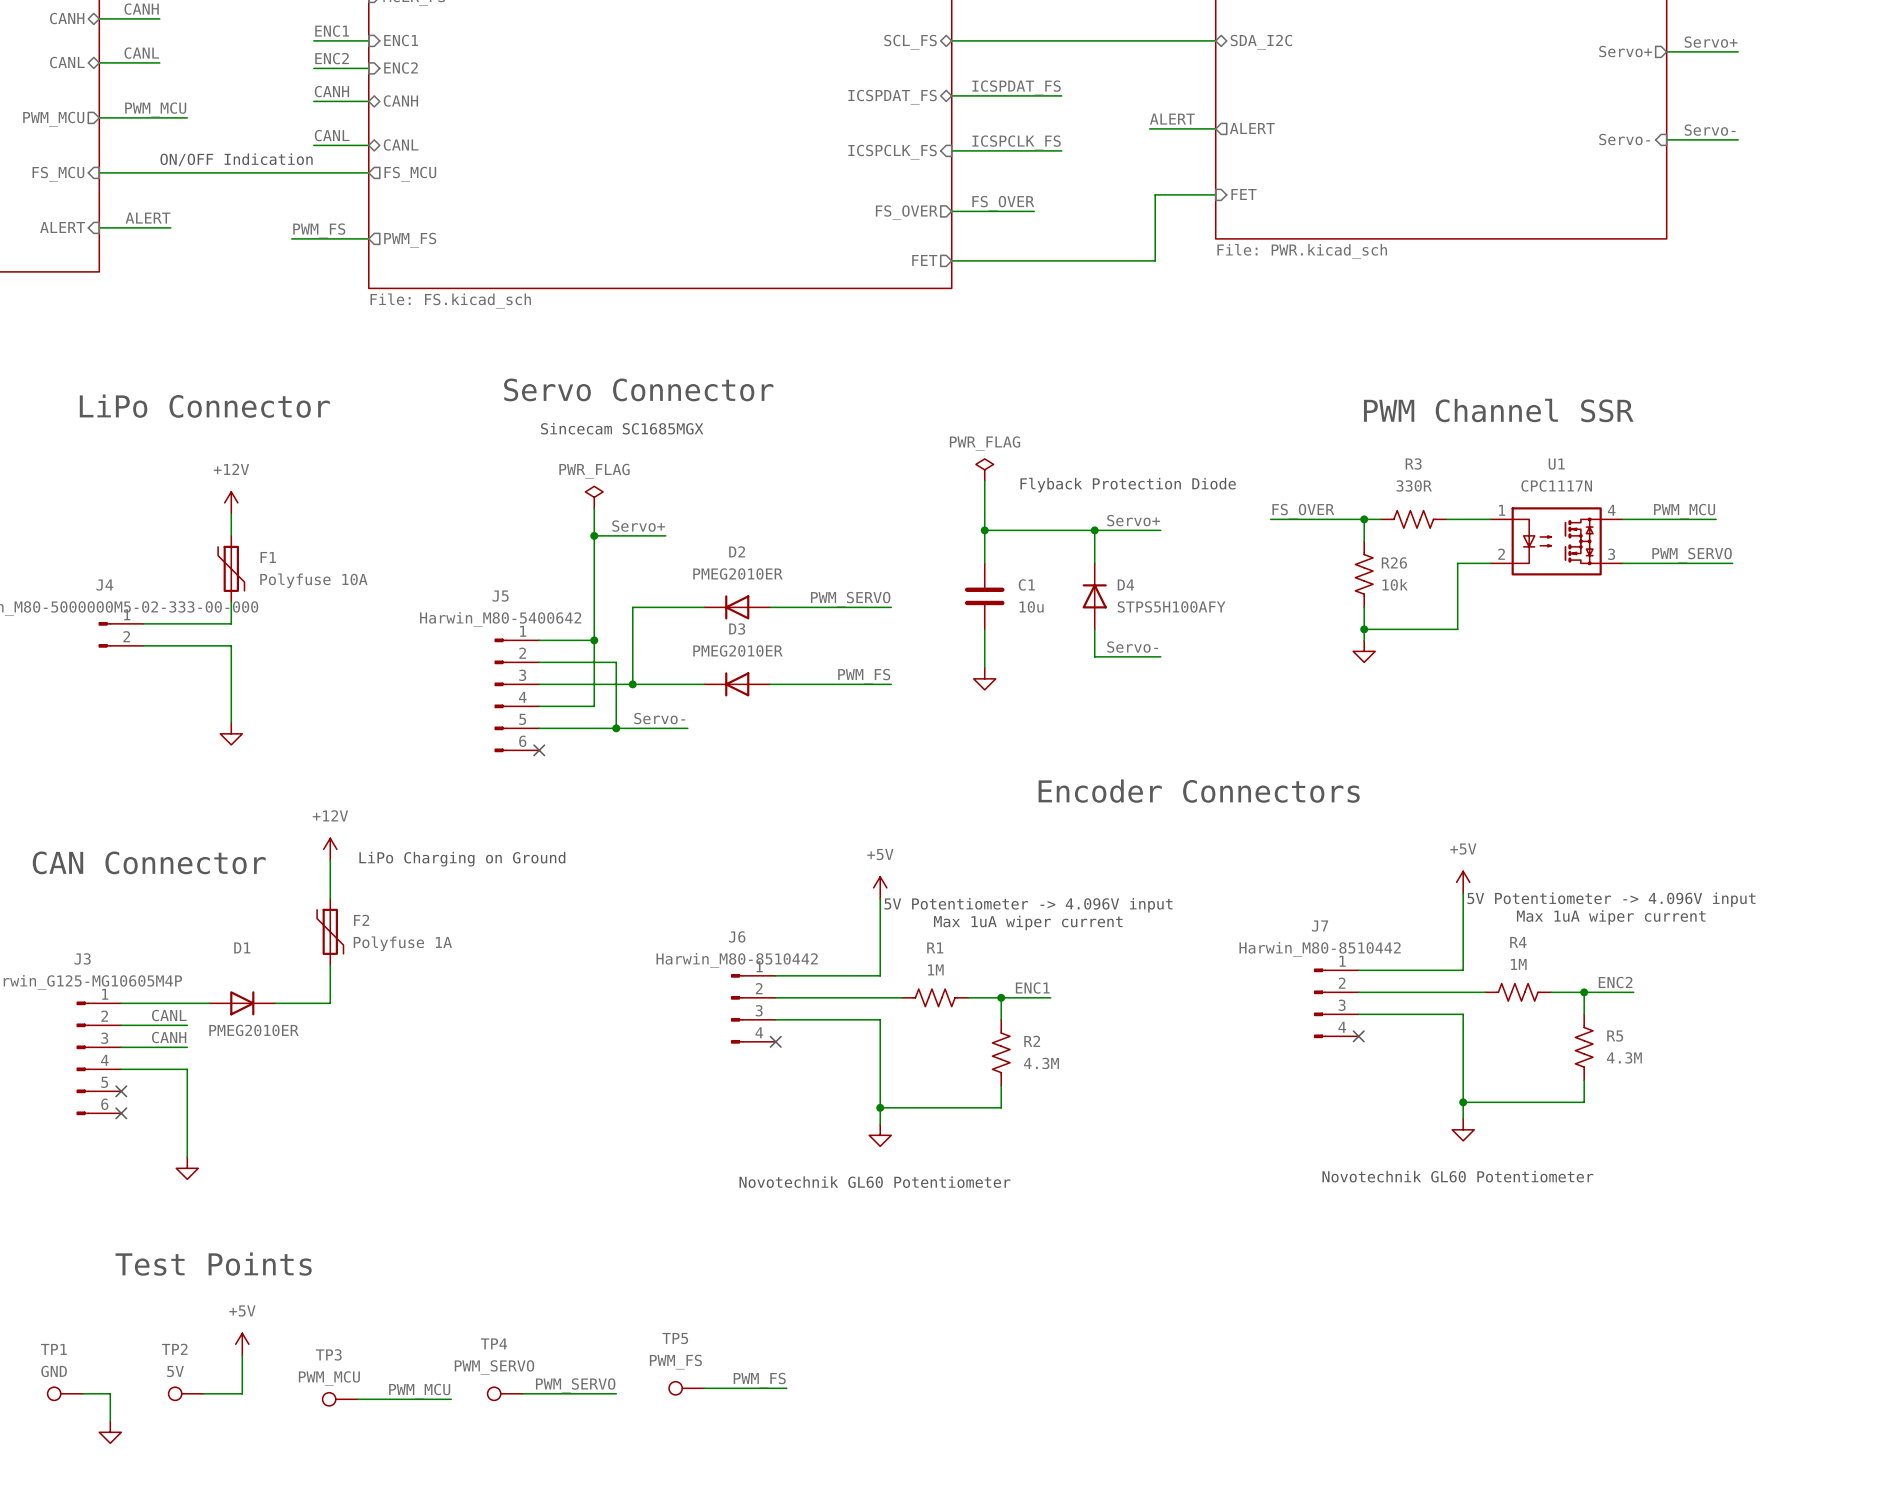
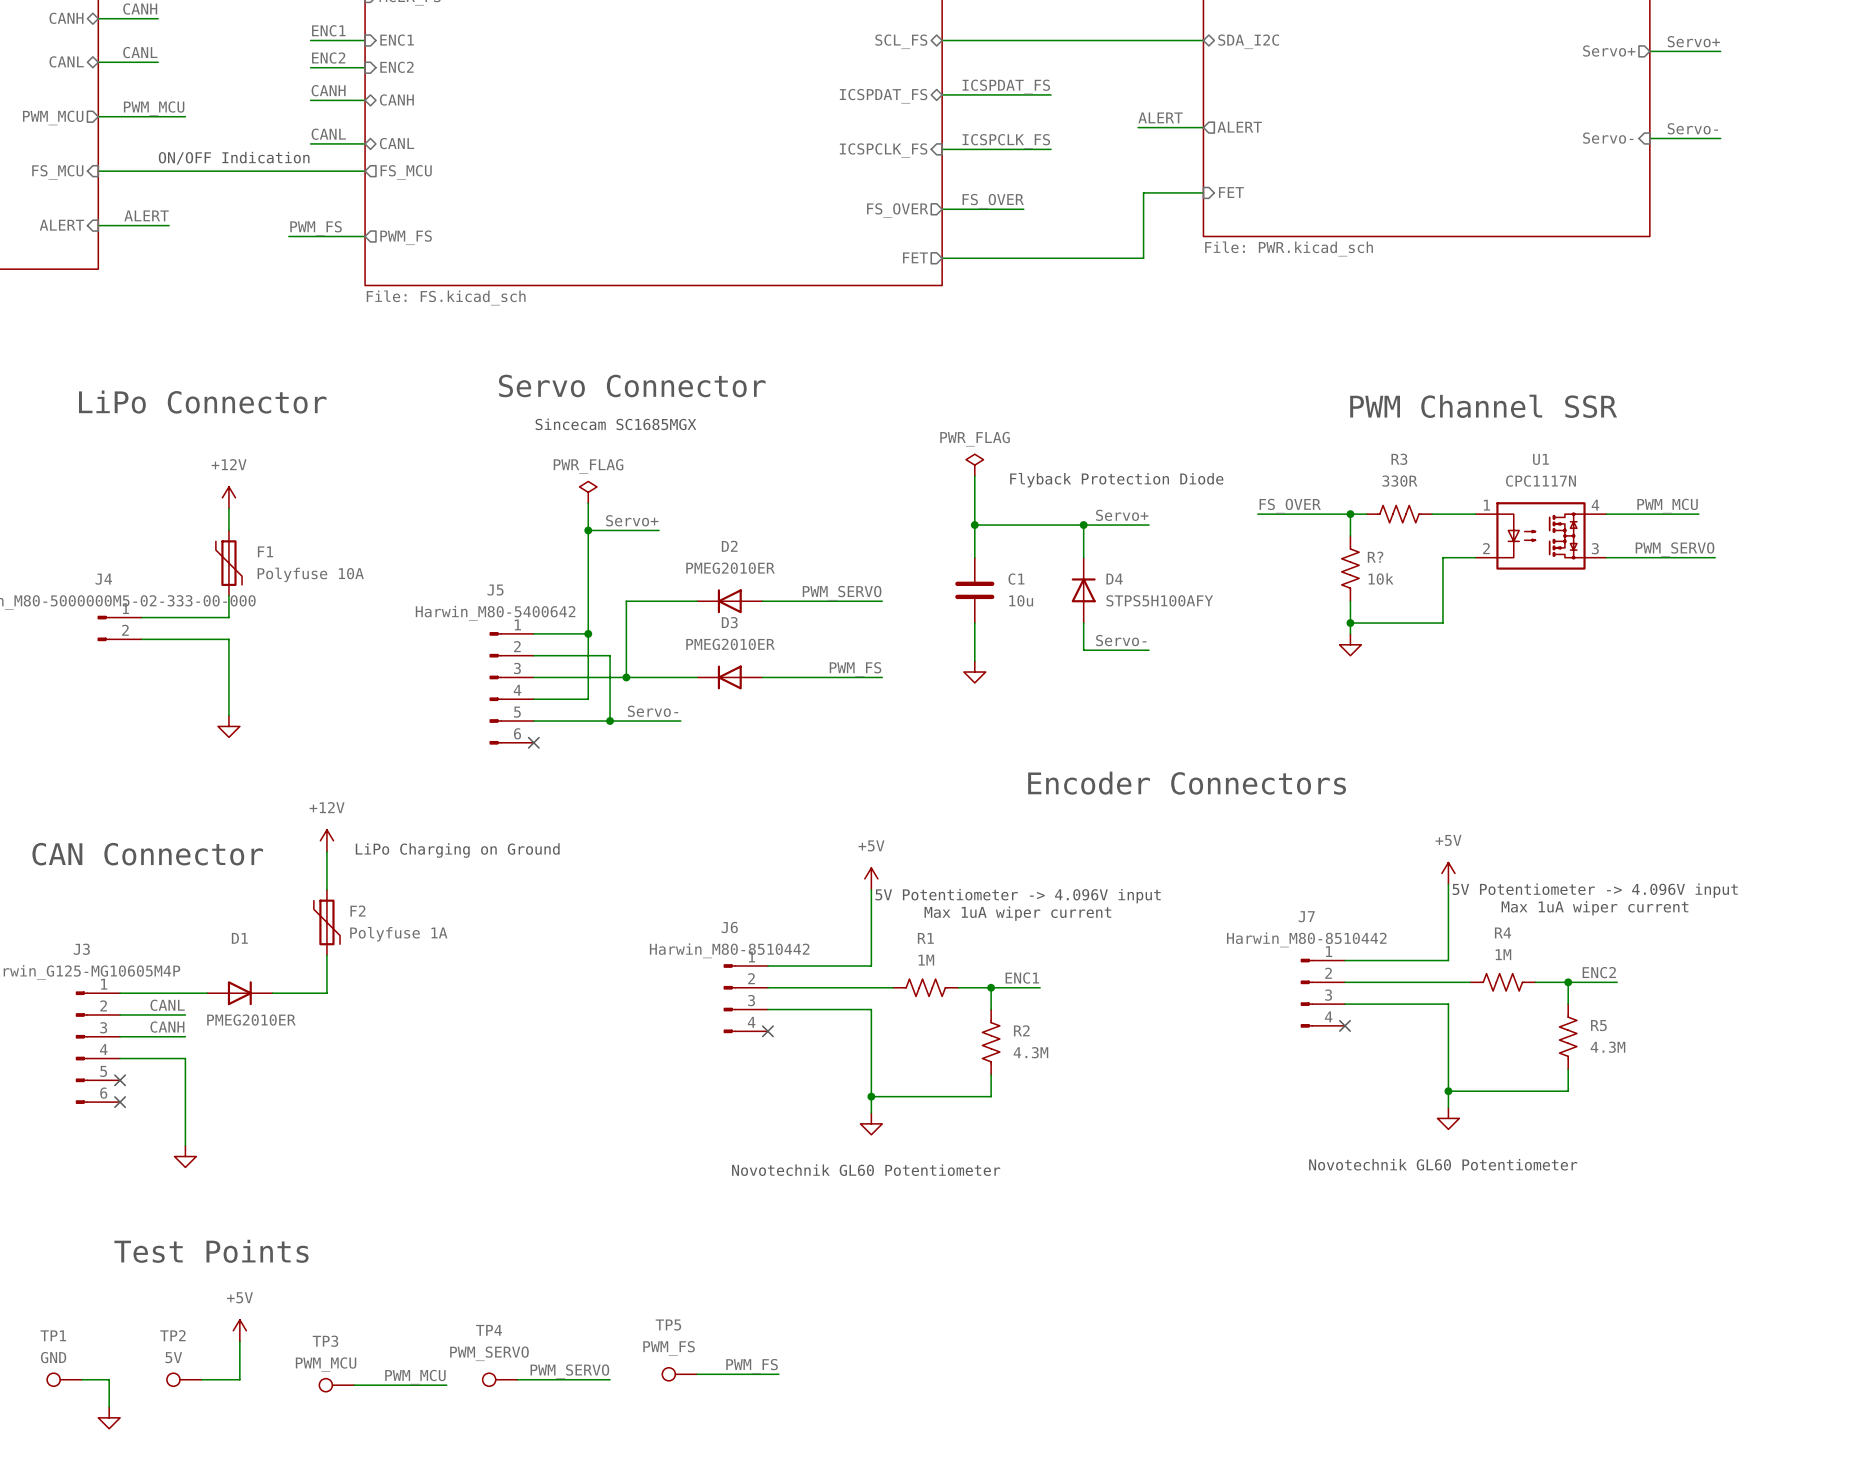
R26 name: R26 (1394, 562) -> R? (1375, 557)

